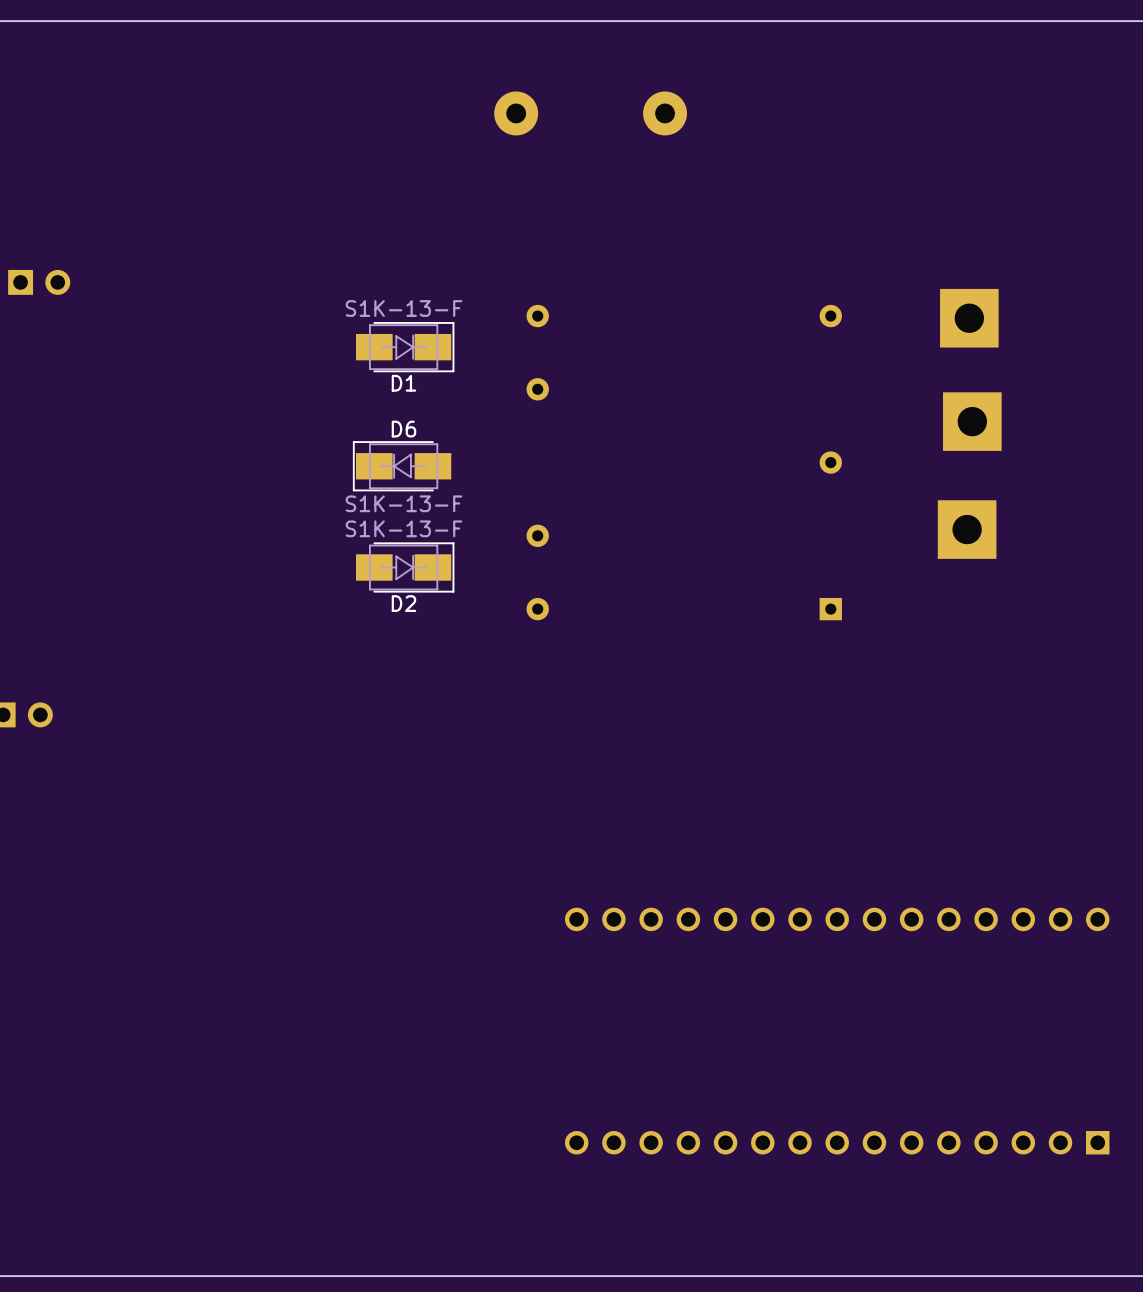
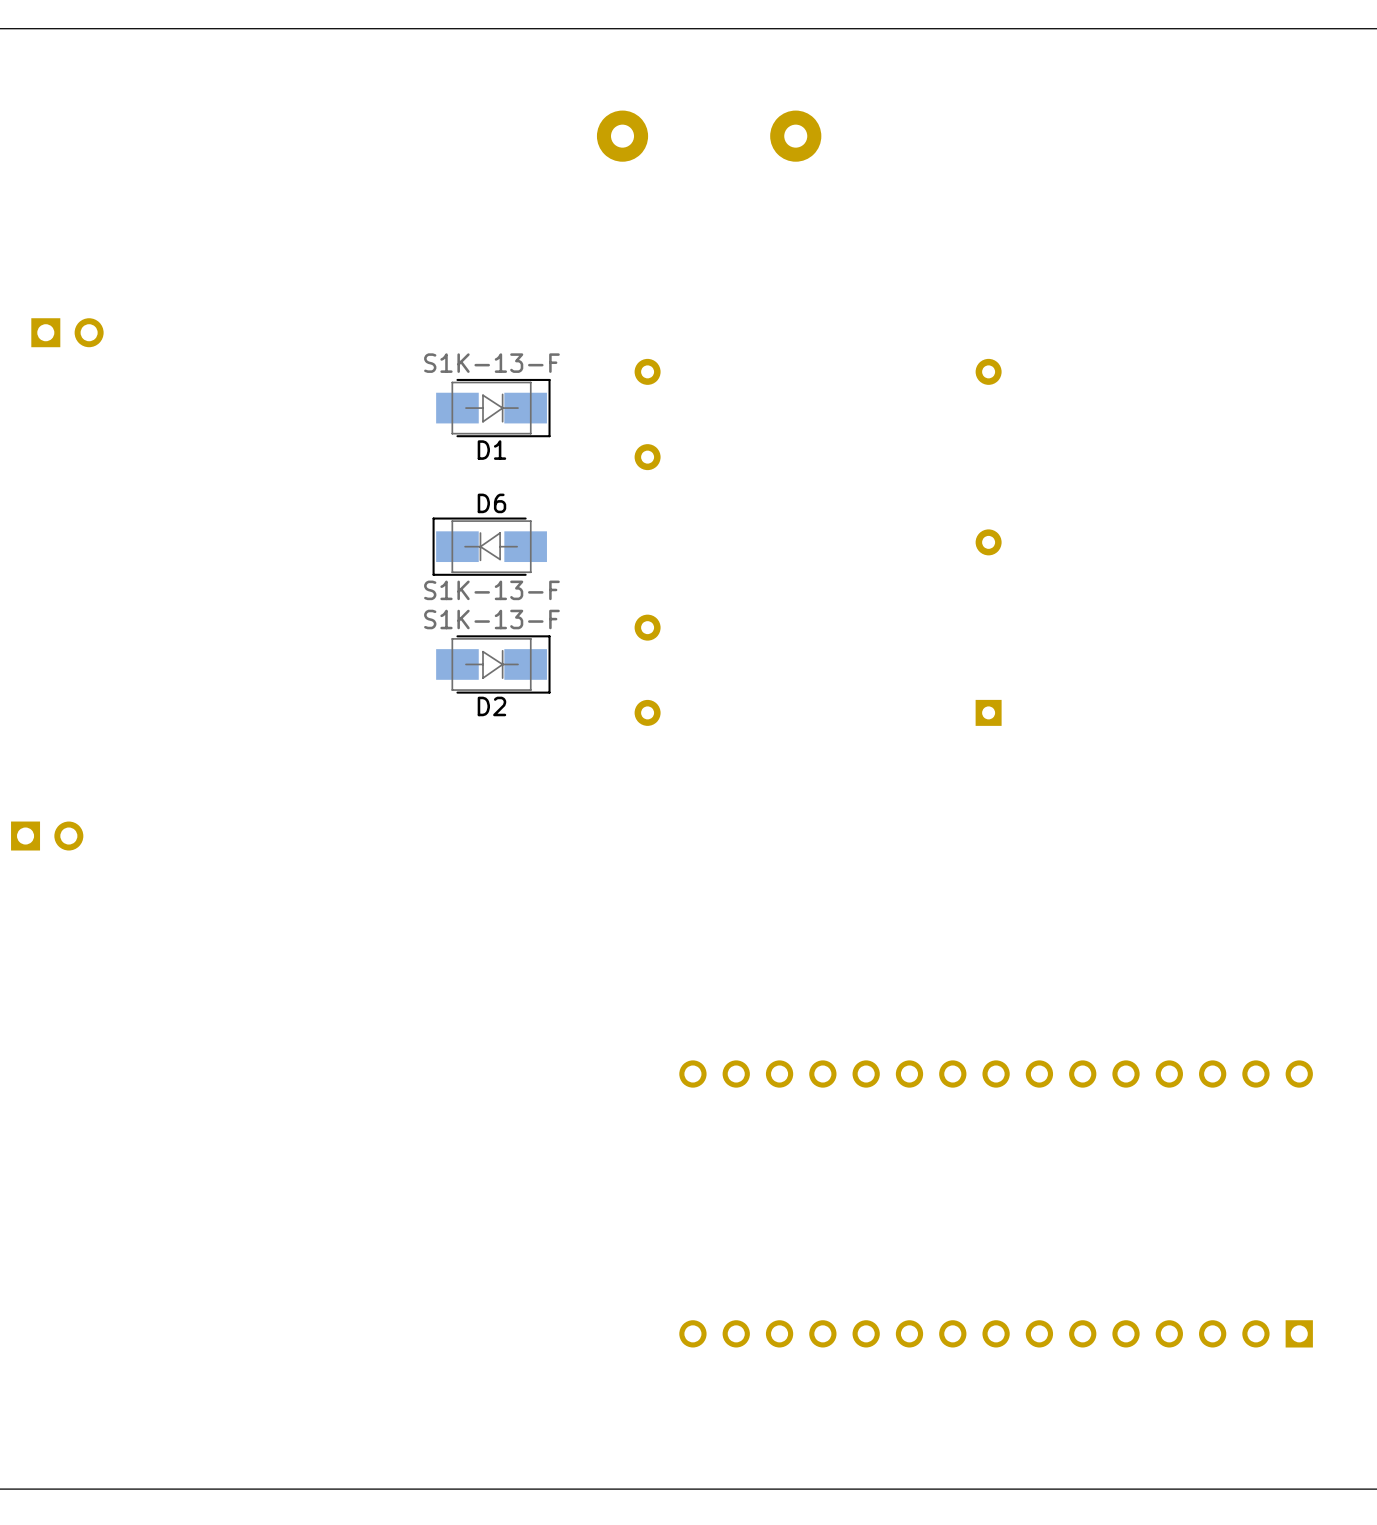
part: (969, 318) -> none
part: (972, 421) -> none
part: (967, 529) -> none

